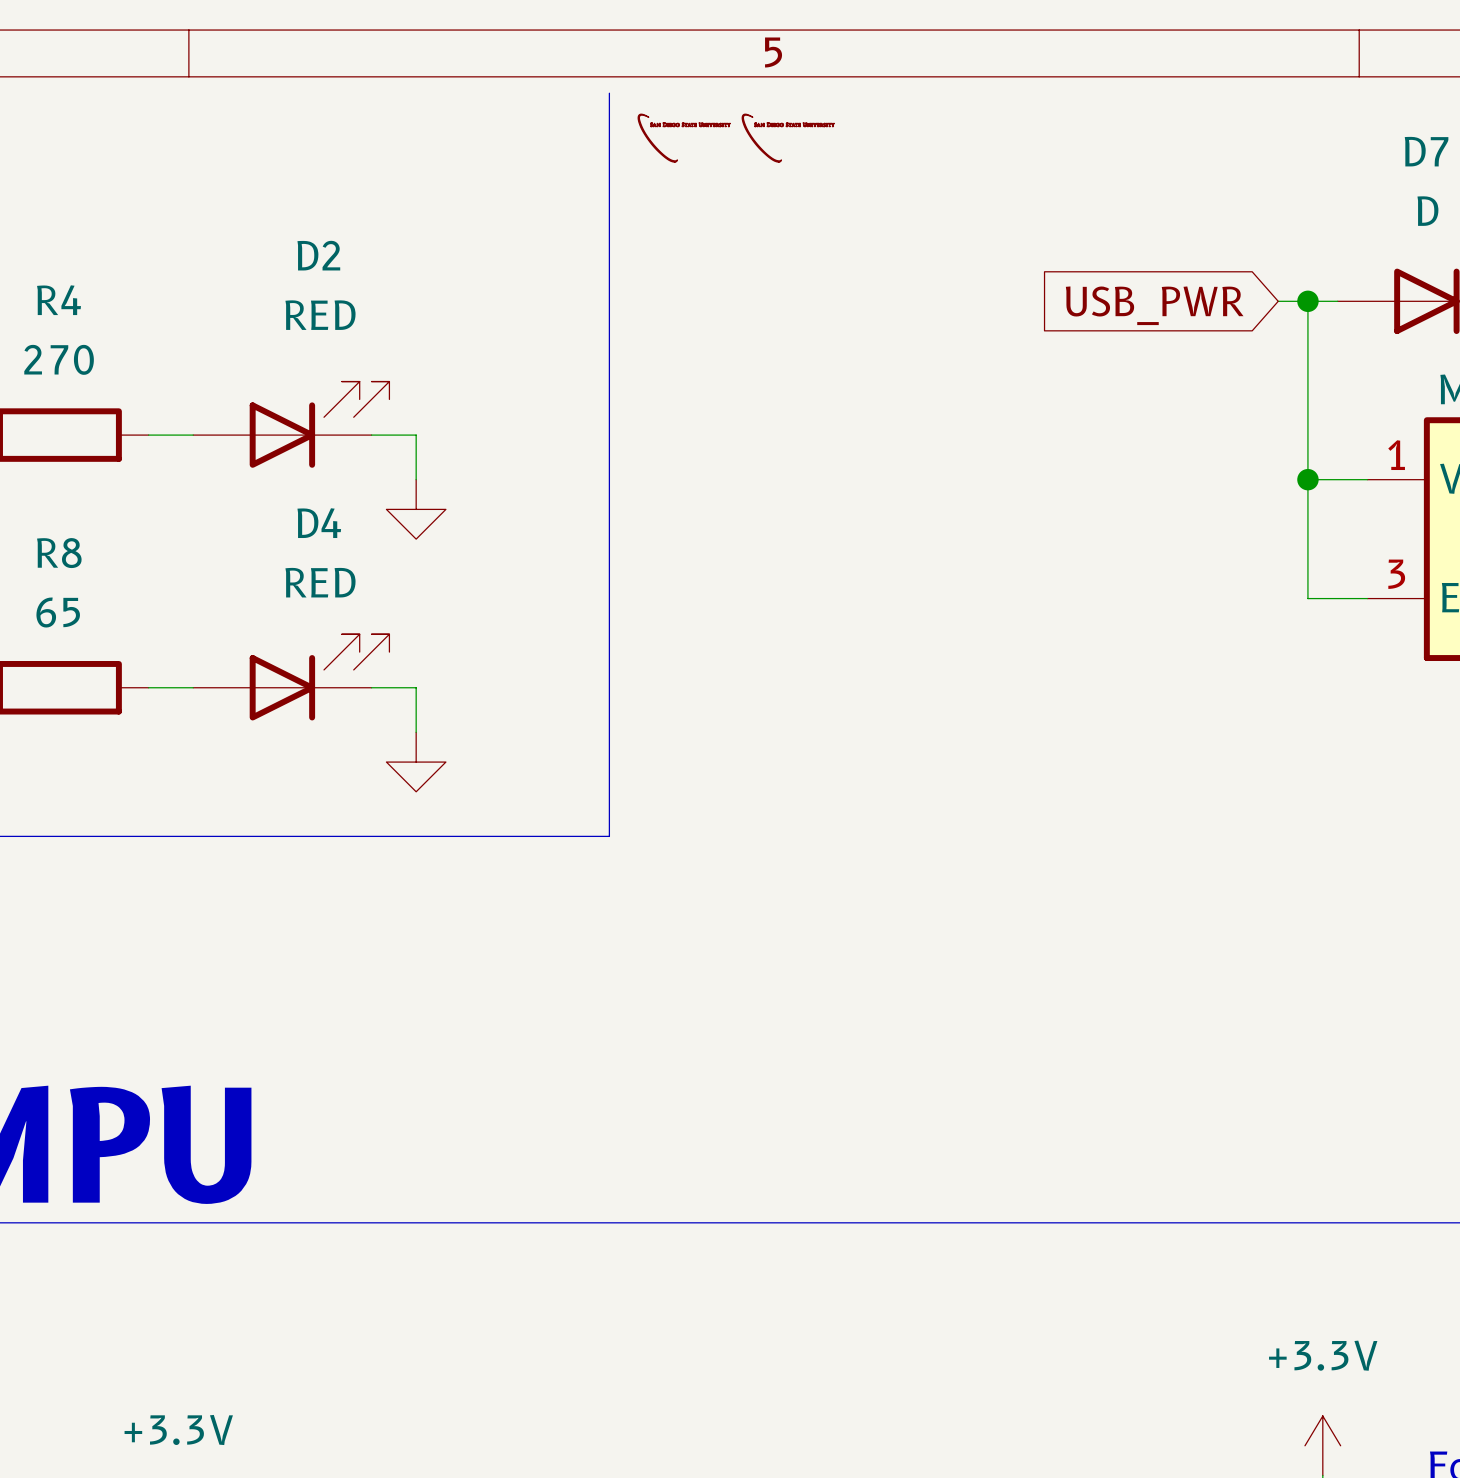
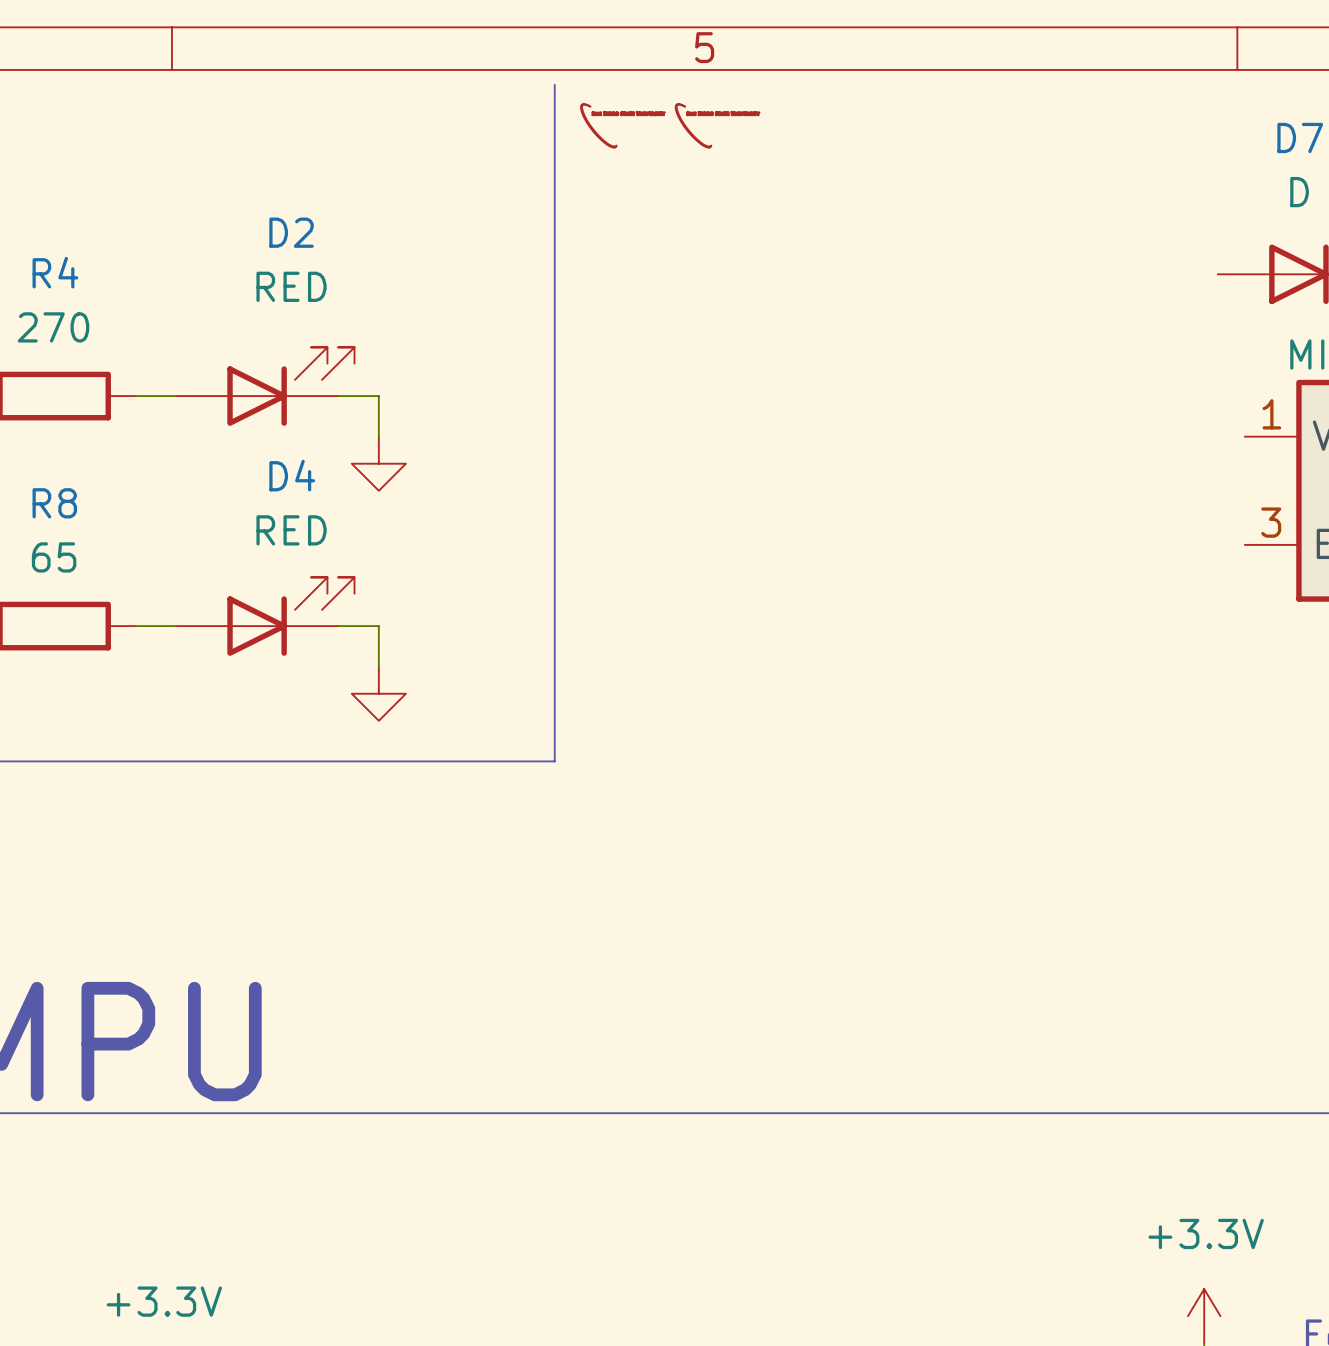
wire: (1278, 301) (1337, 301) -> none
wire: (1307, 301) (1307, 598) (1367, 598) -> none
junction: (1307, 301) -> none
global label: USB_PWR (1154, 305) -> none
wire: (1307, 479) (1367, 479) -> none
junction: (1307, 479) -> none

